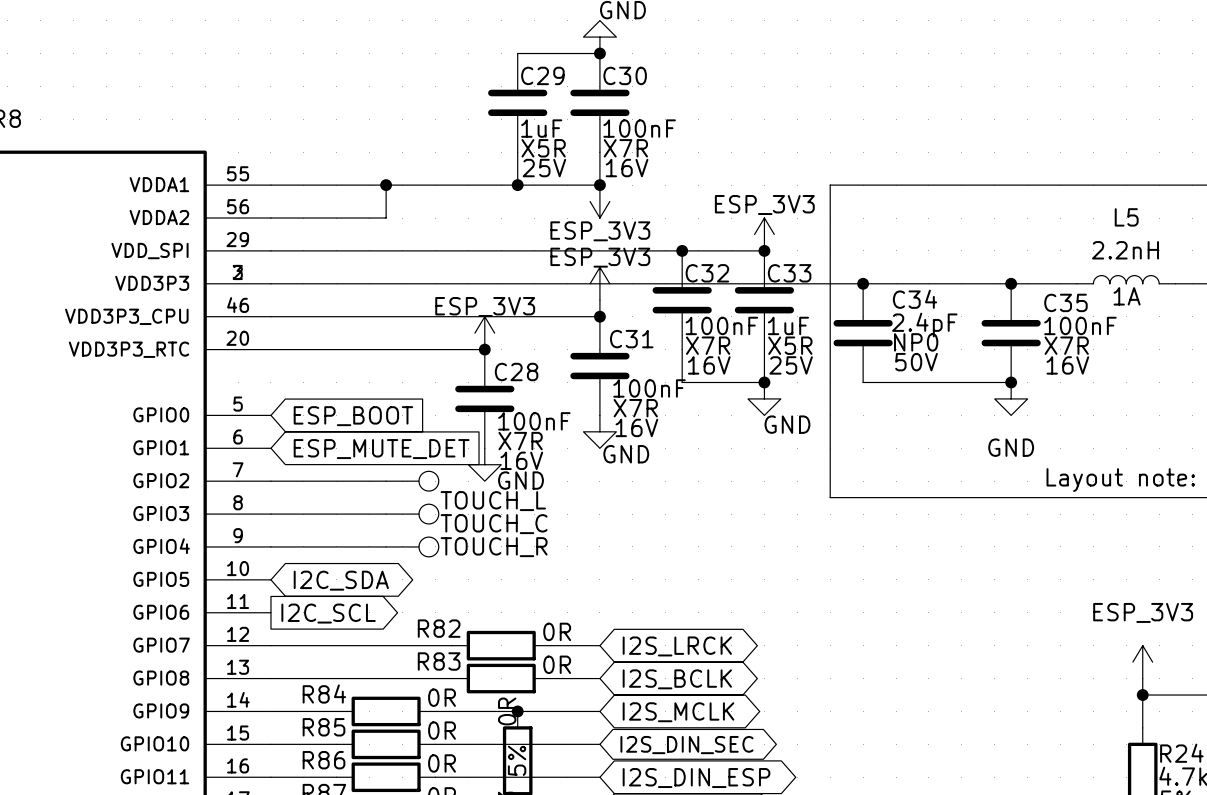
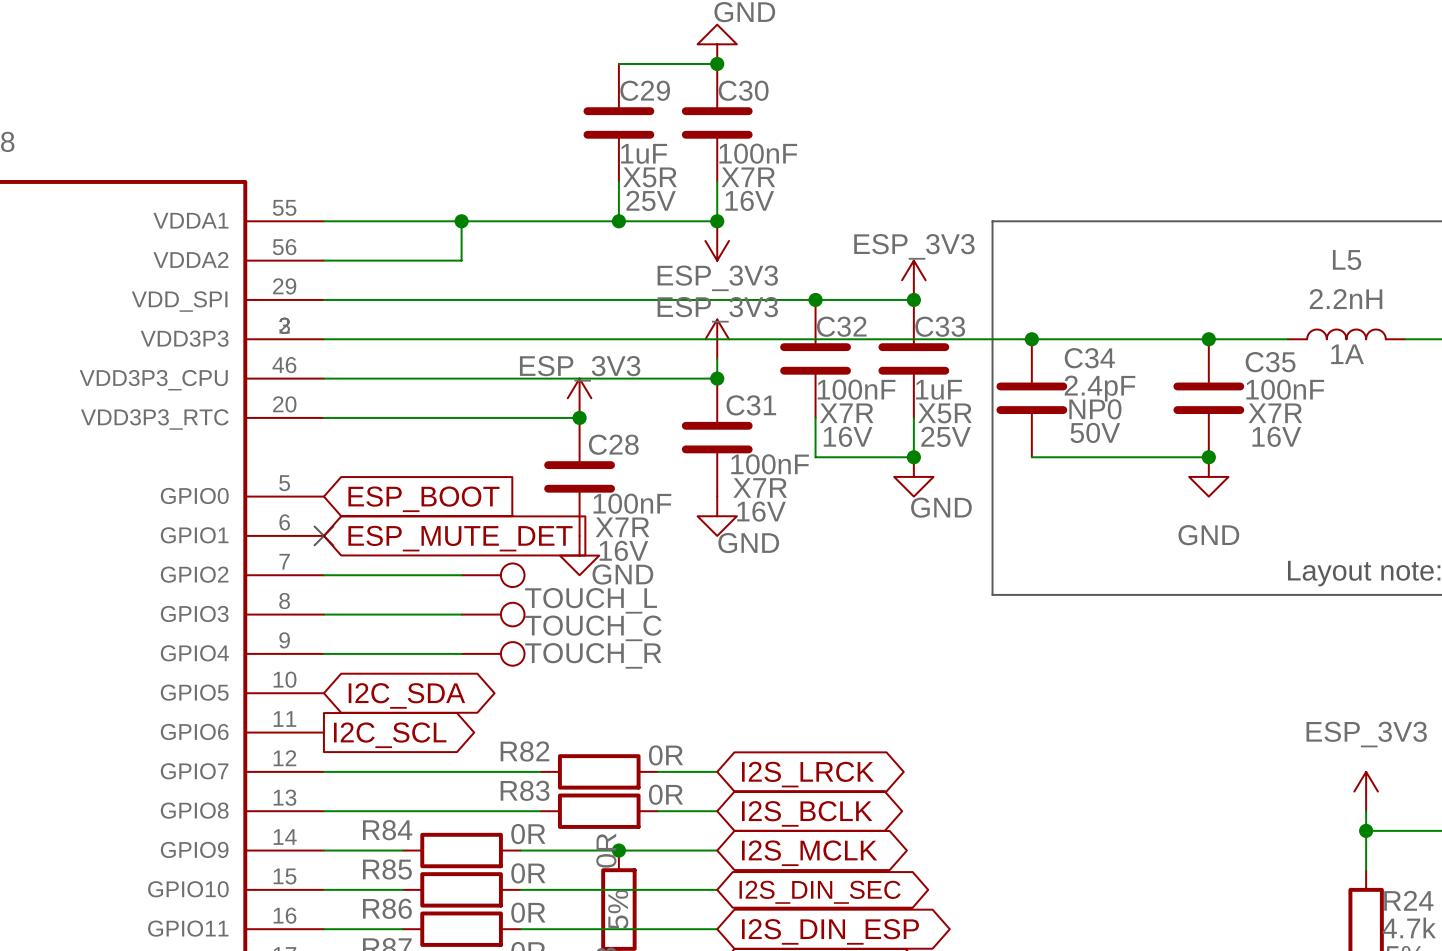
no-connect mark: none -> (323, 535)

